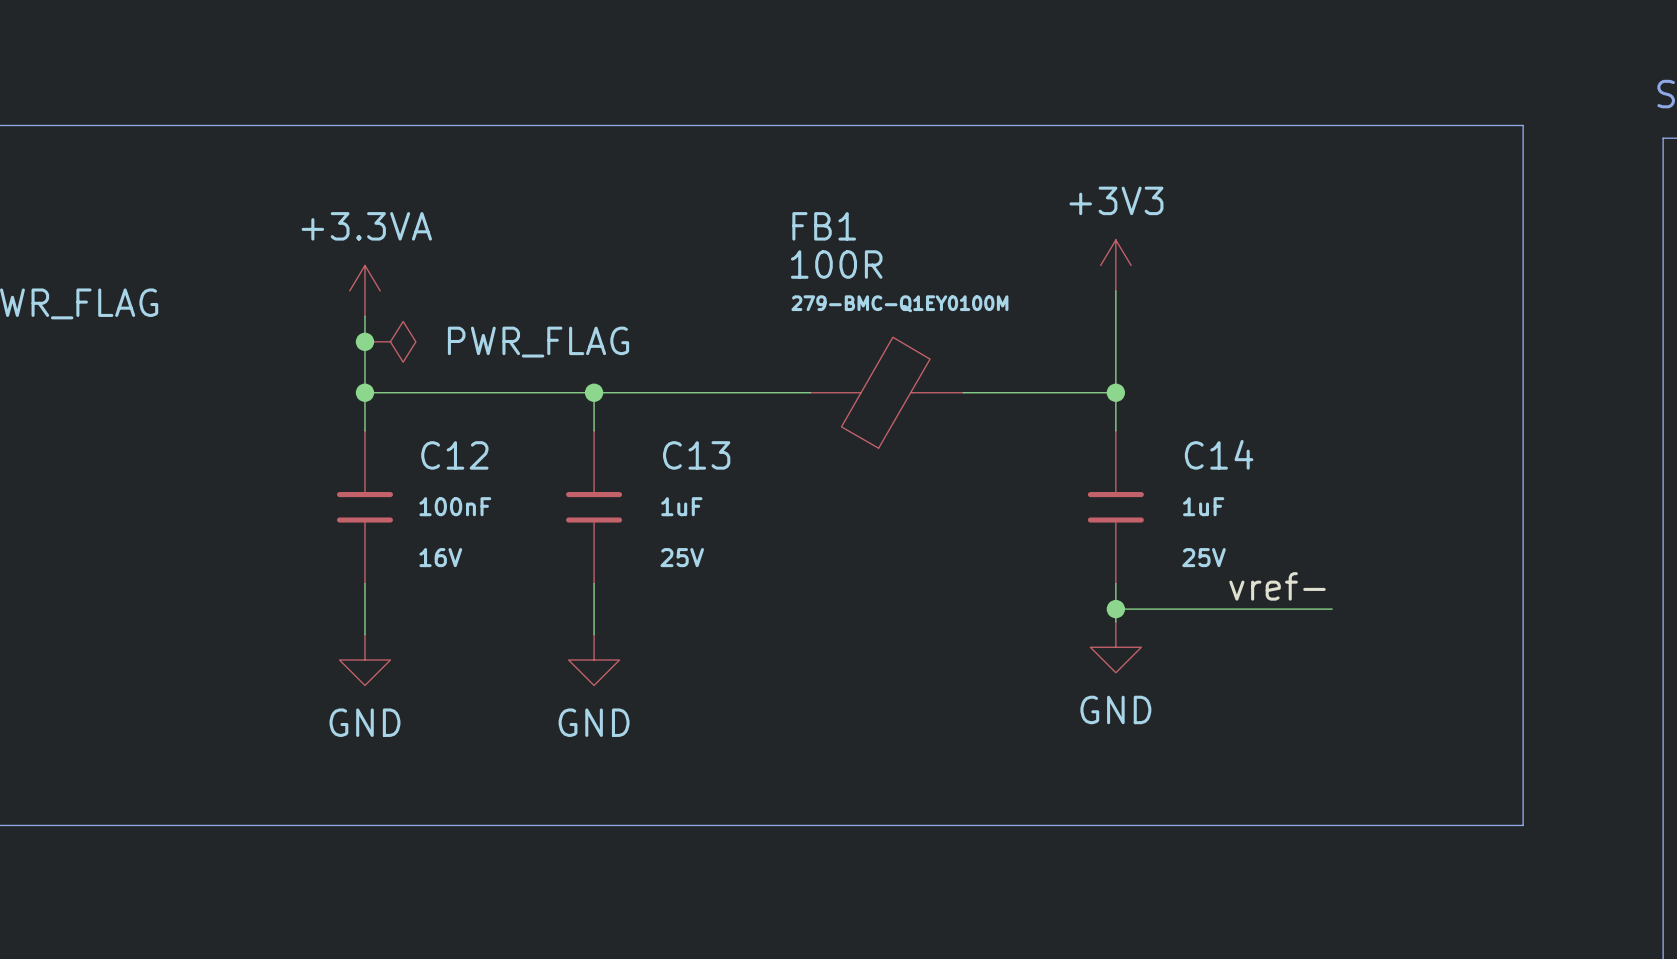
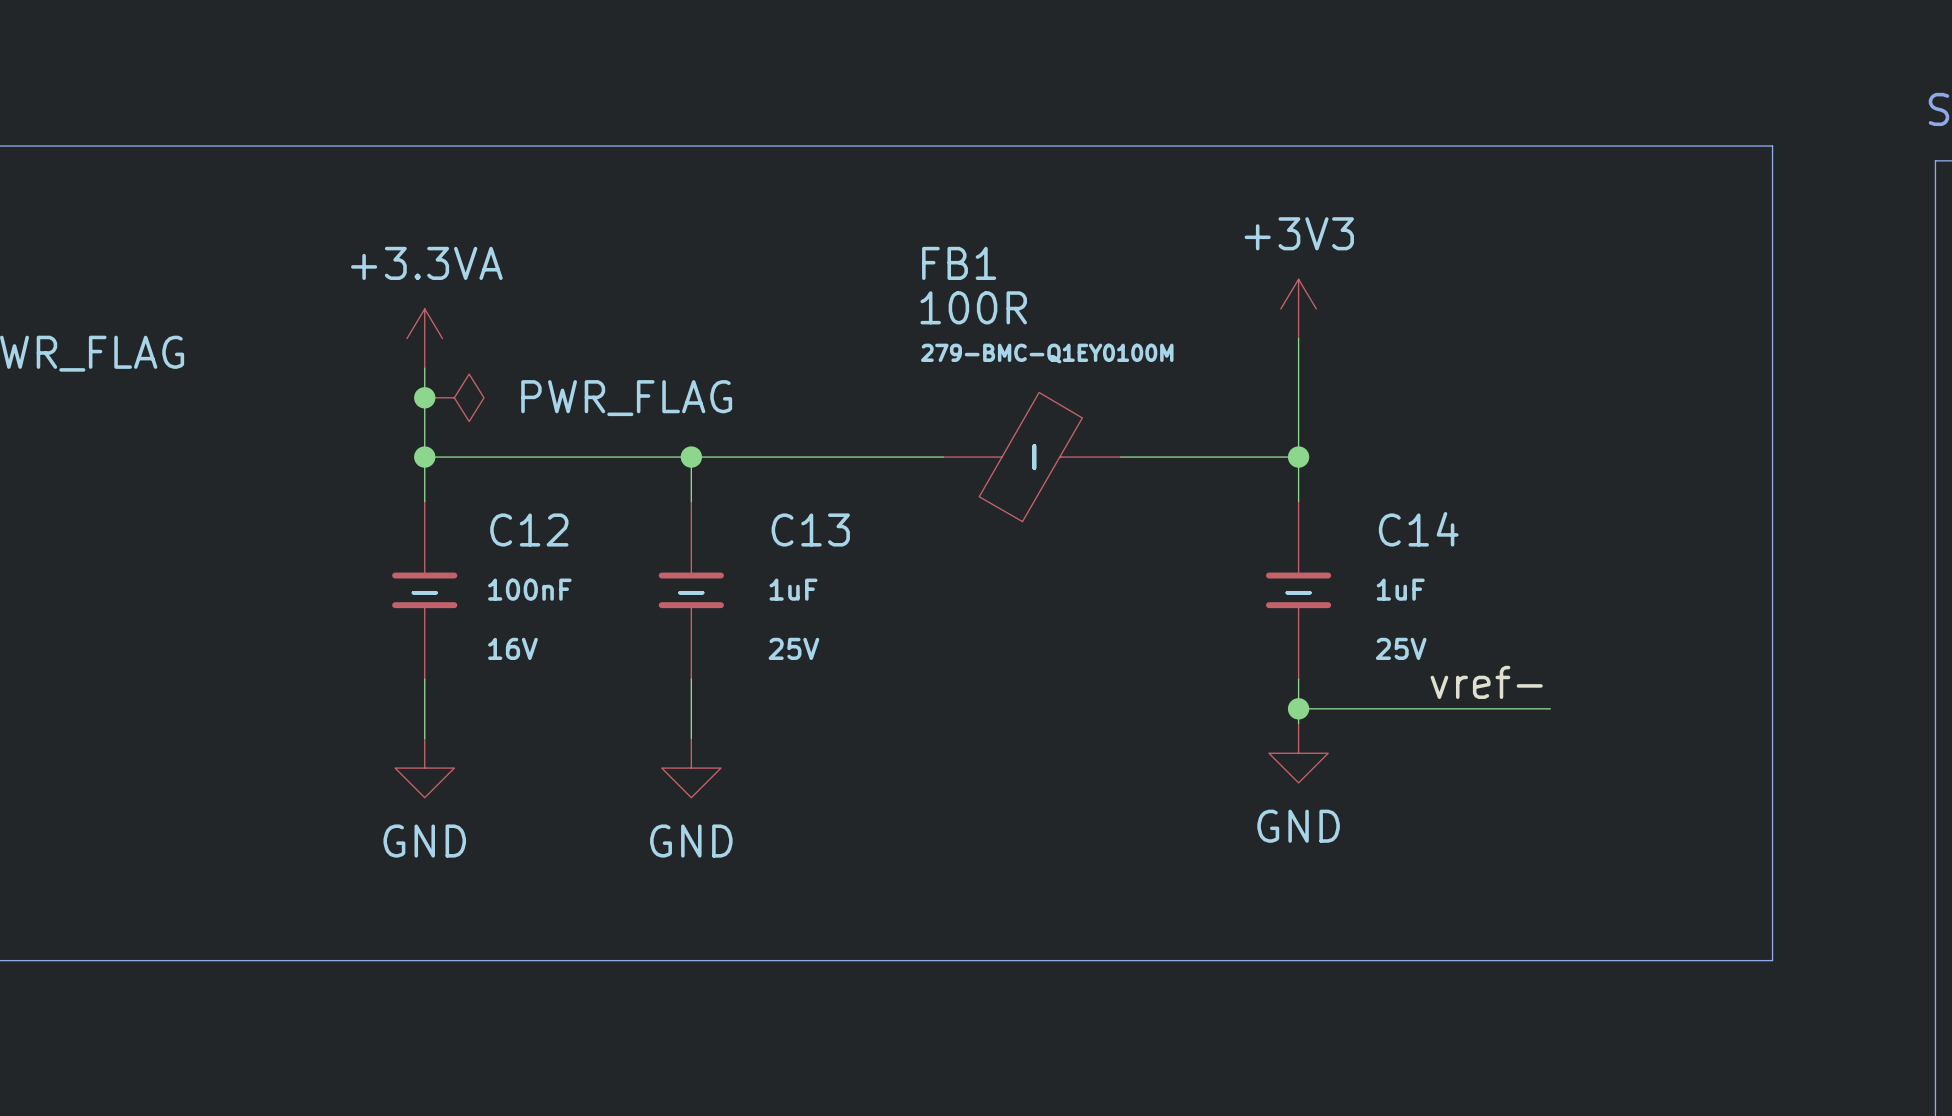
FB1 text: none -> - (1034, 457)
FB1 text: none -> - (1034, 457)
FB1 text: none -> - (1034, 457)
C12 text: none -> - (424, 592)
C12 text: none -> - (424, 592)
C13 text: none -> - (691, 592)
C13 text: none -> - (691, 592)
C14 text: none -> - (1298, 592)
C14 text: none -> - (1298, 592)

